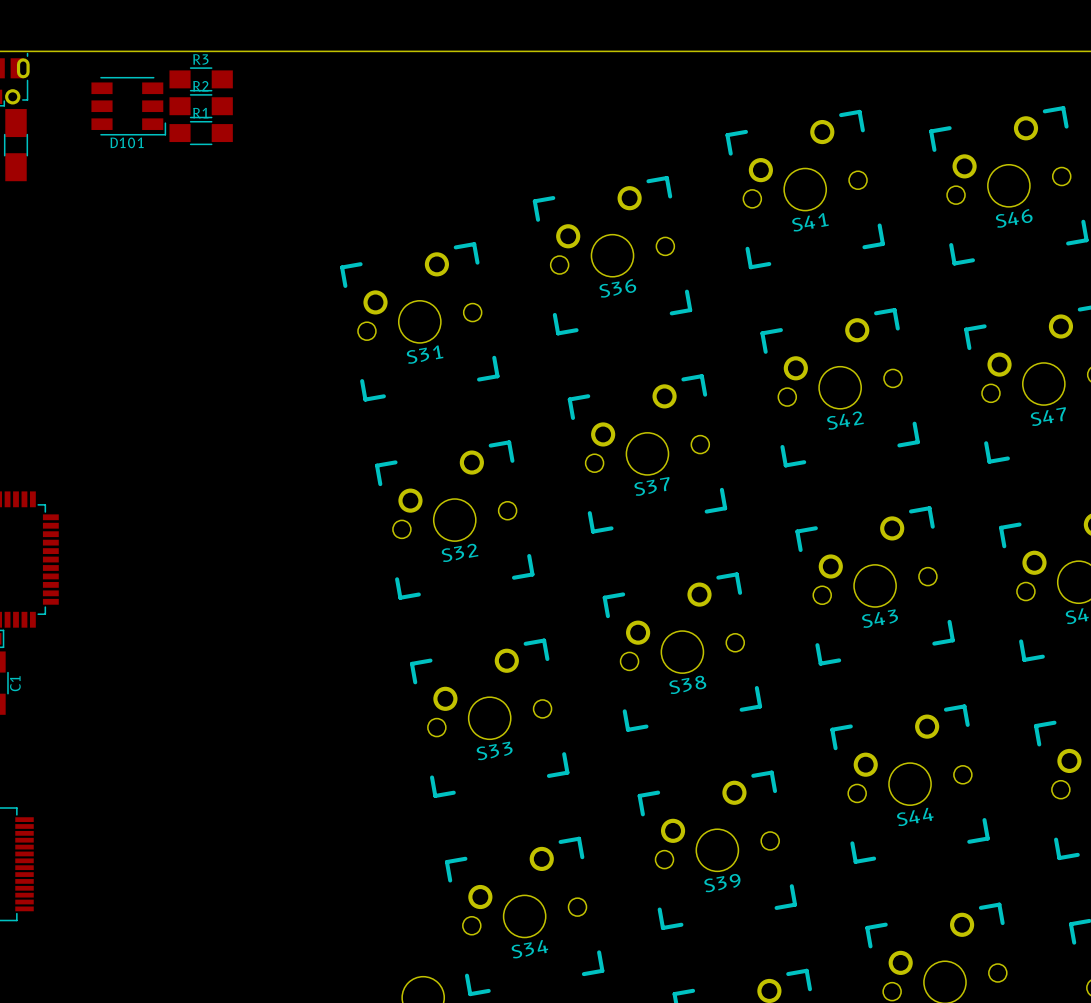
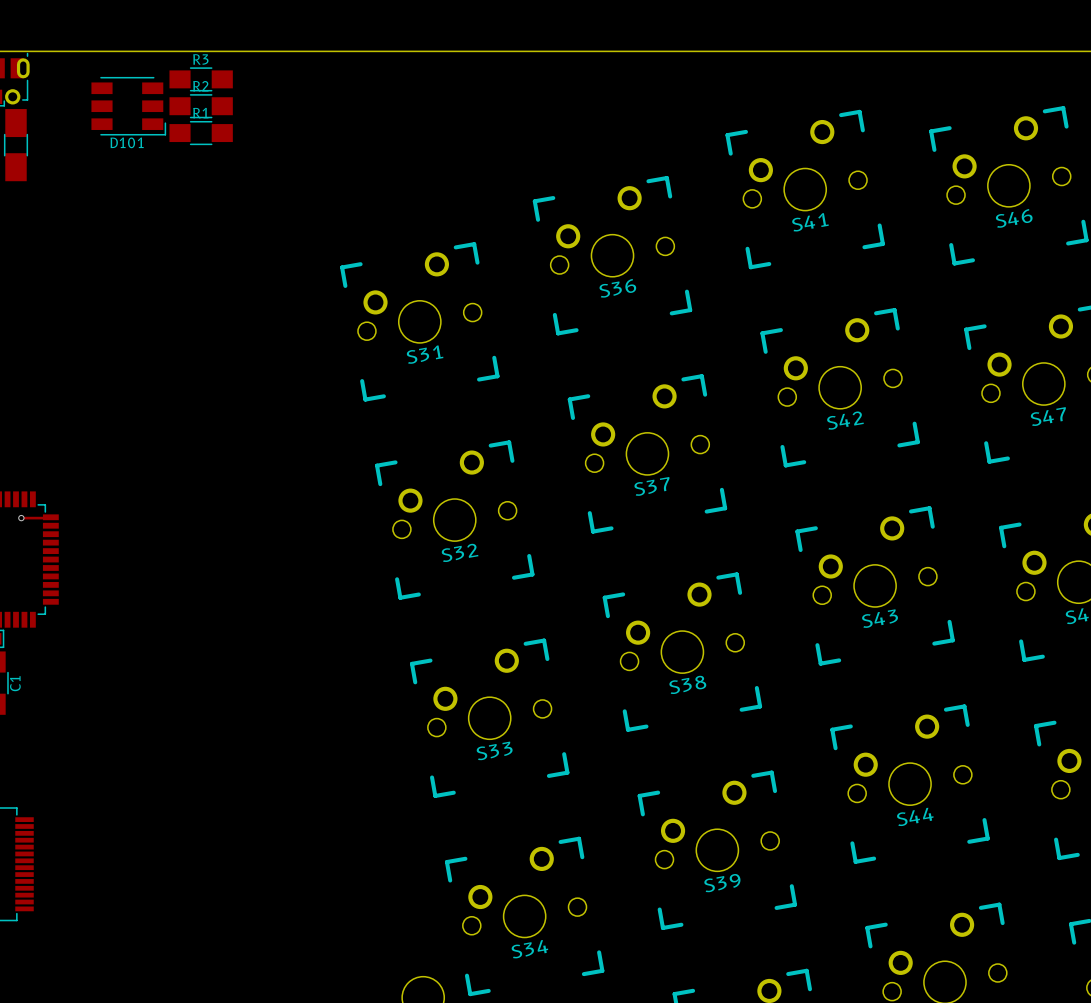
track: none -> (50, 517) (21, 518)
via: none -> (21, 518)

